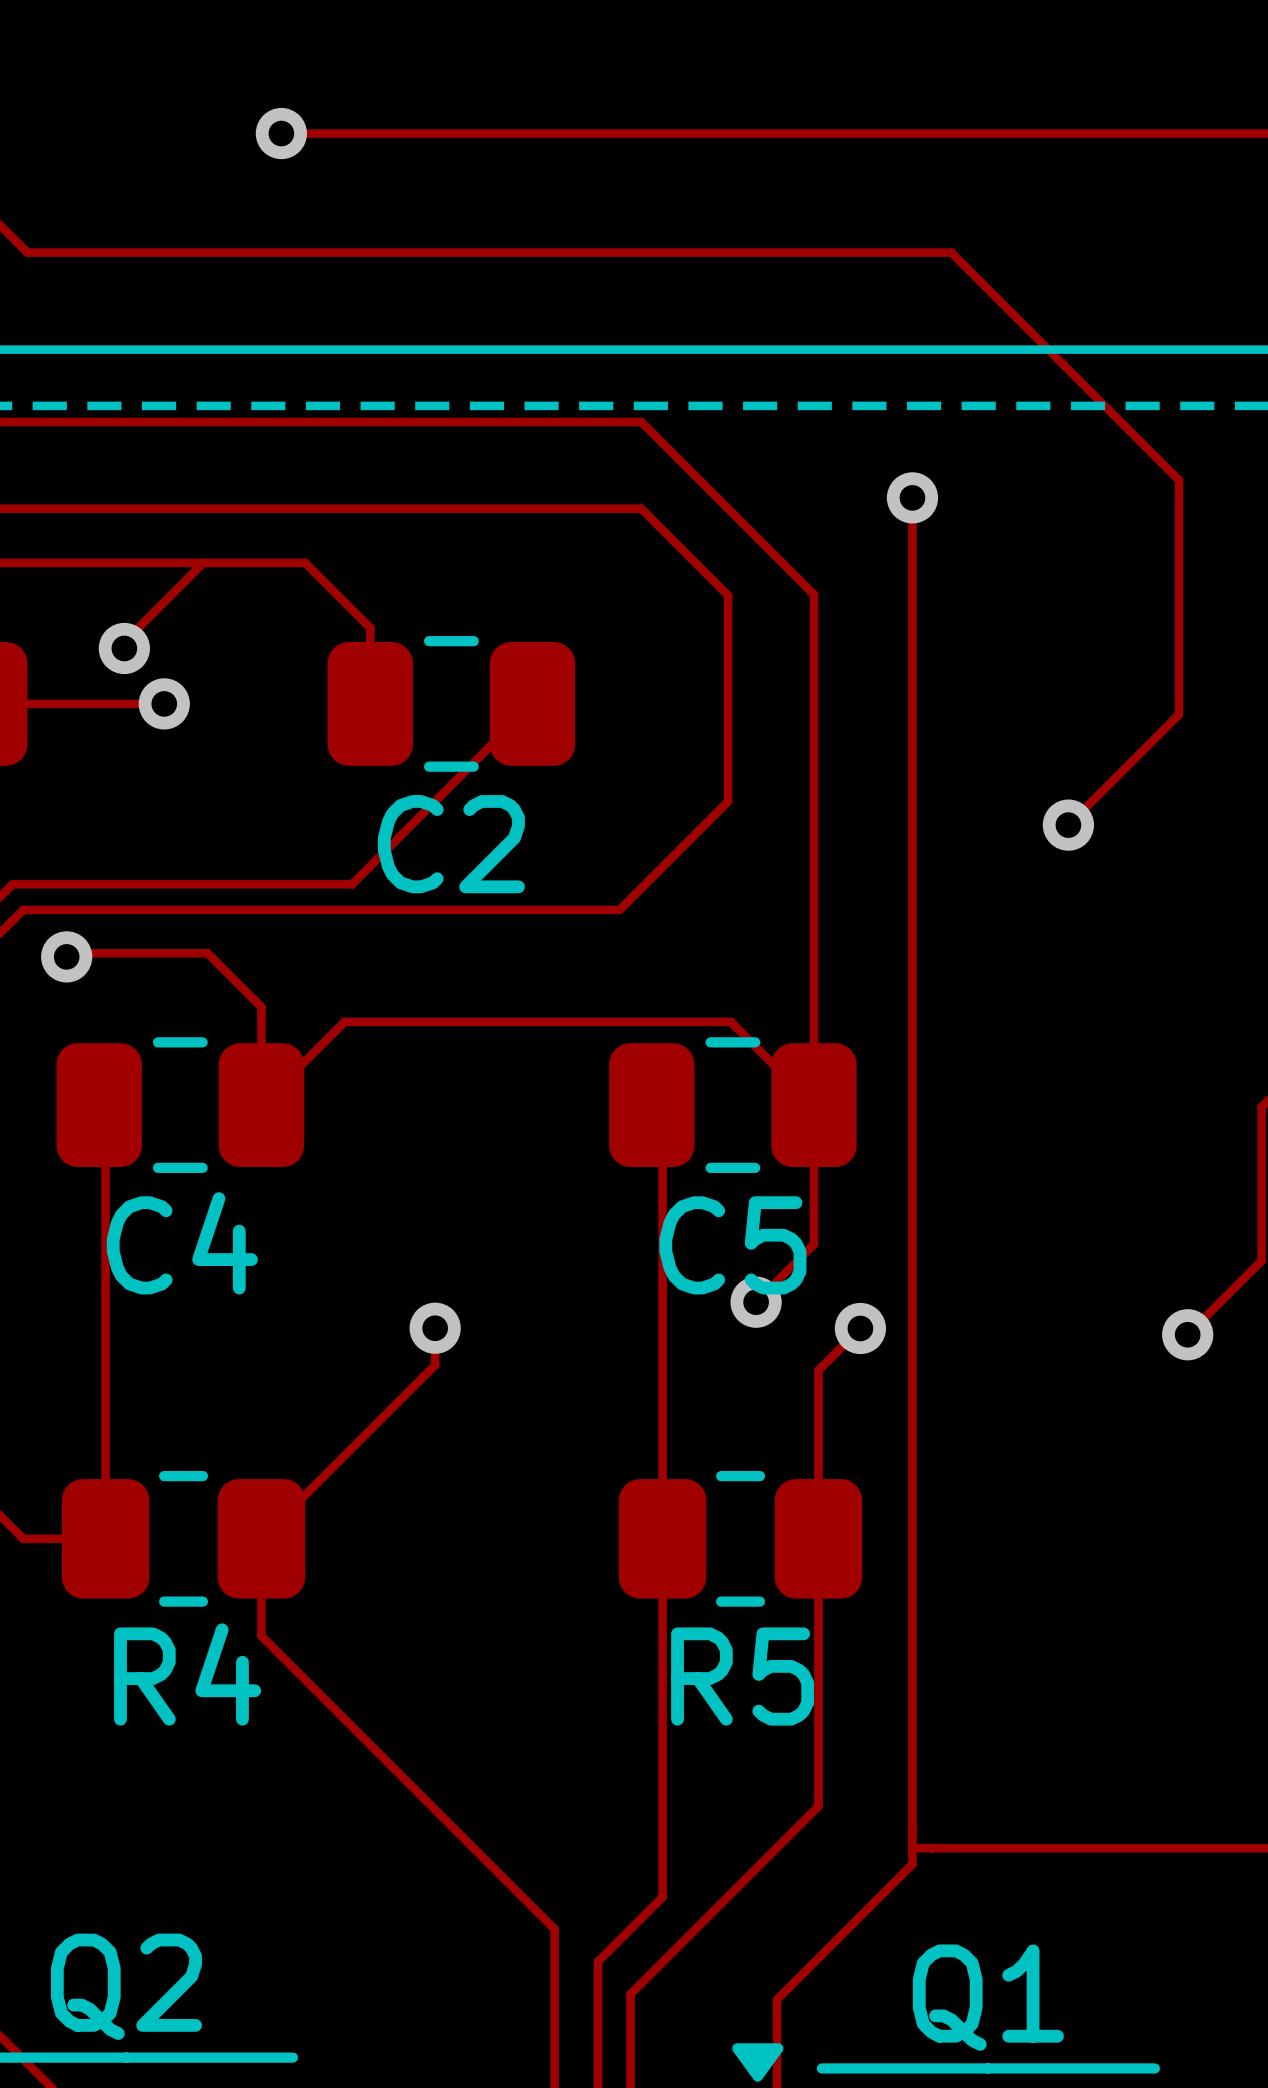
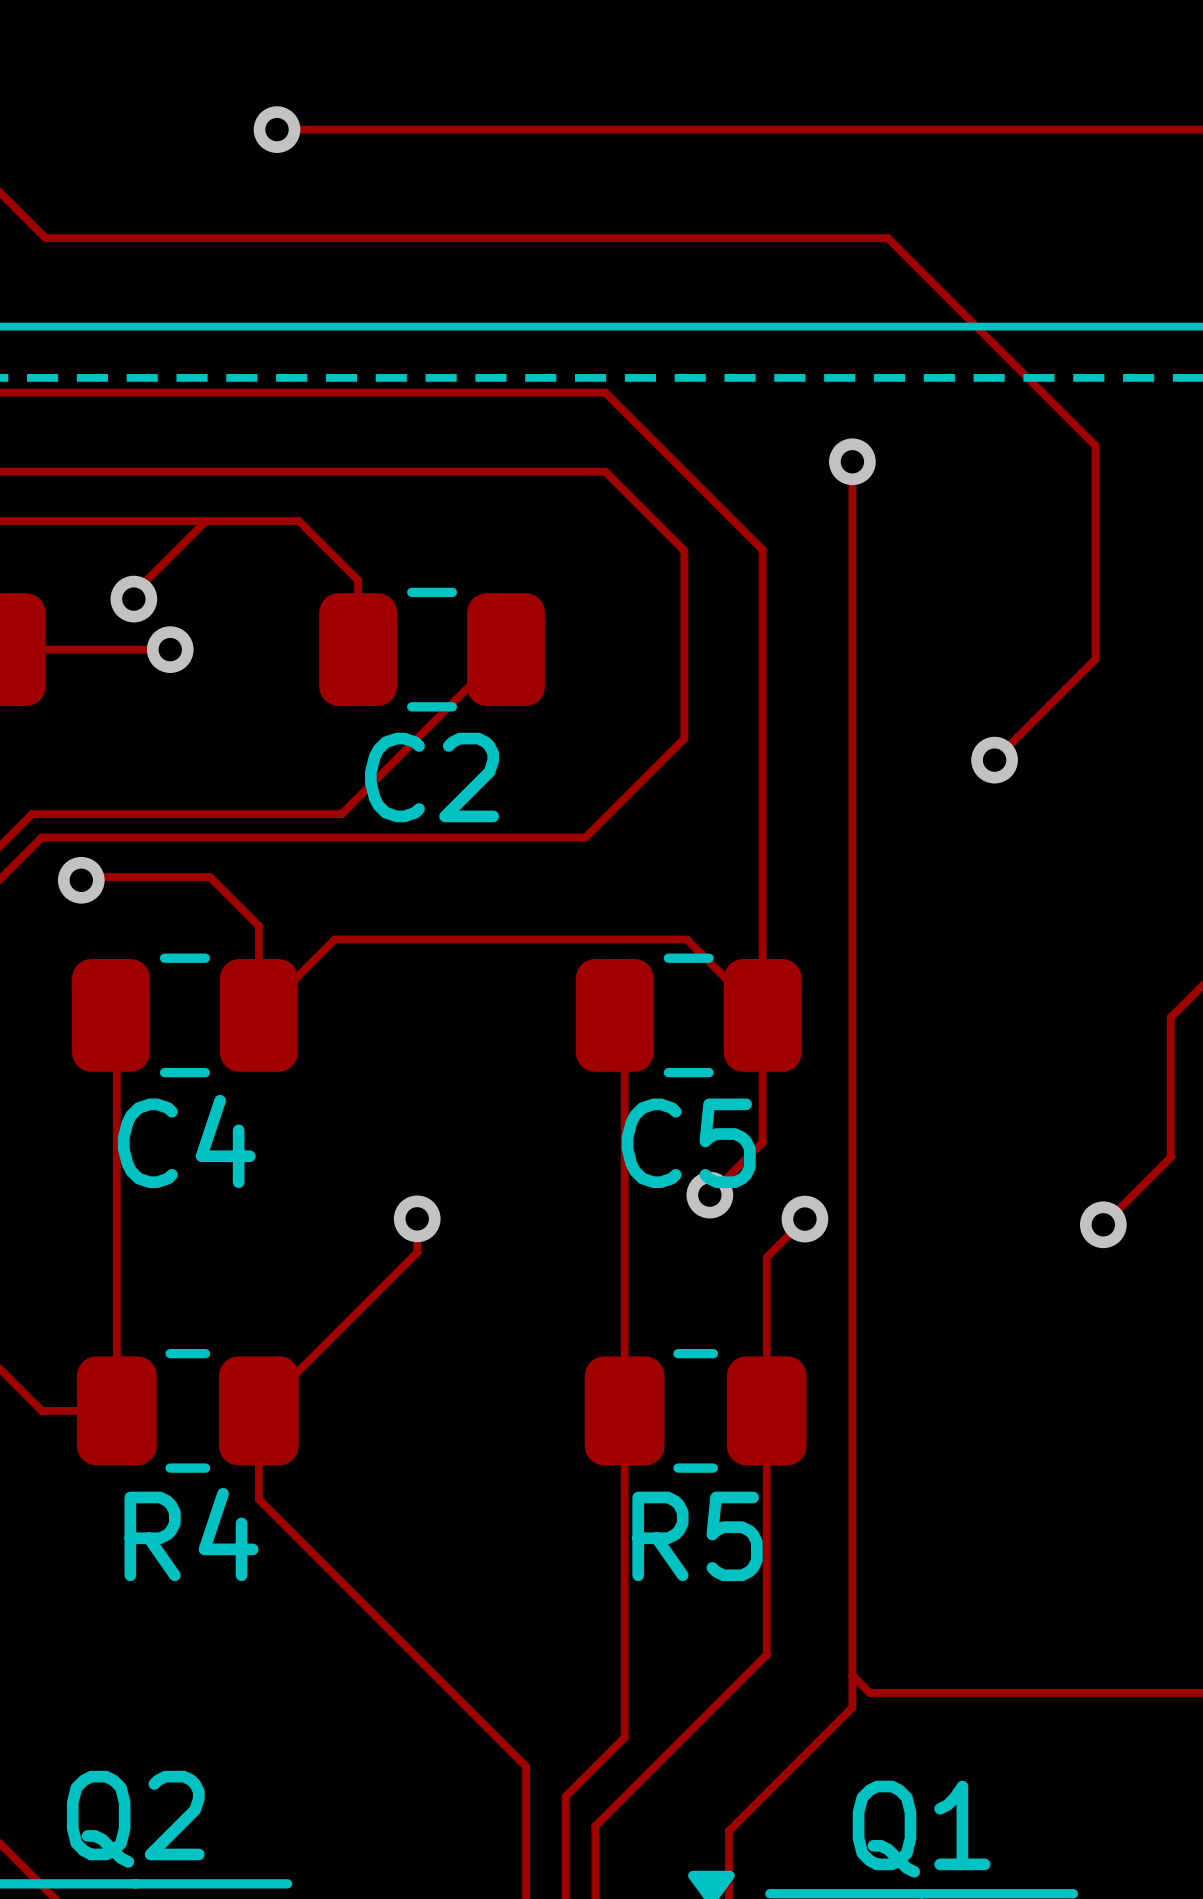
track: (912, 1848) (931, 1848) -> (852, 1675) (869, 1692)

